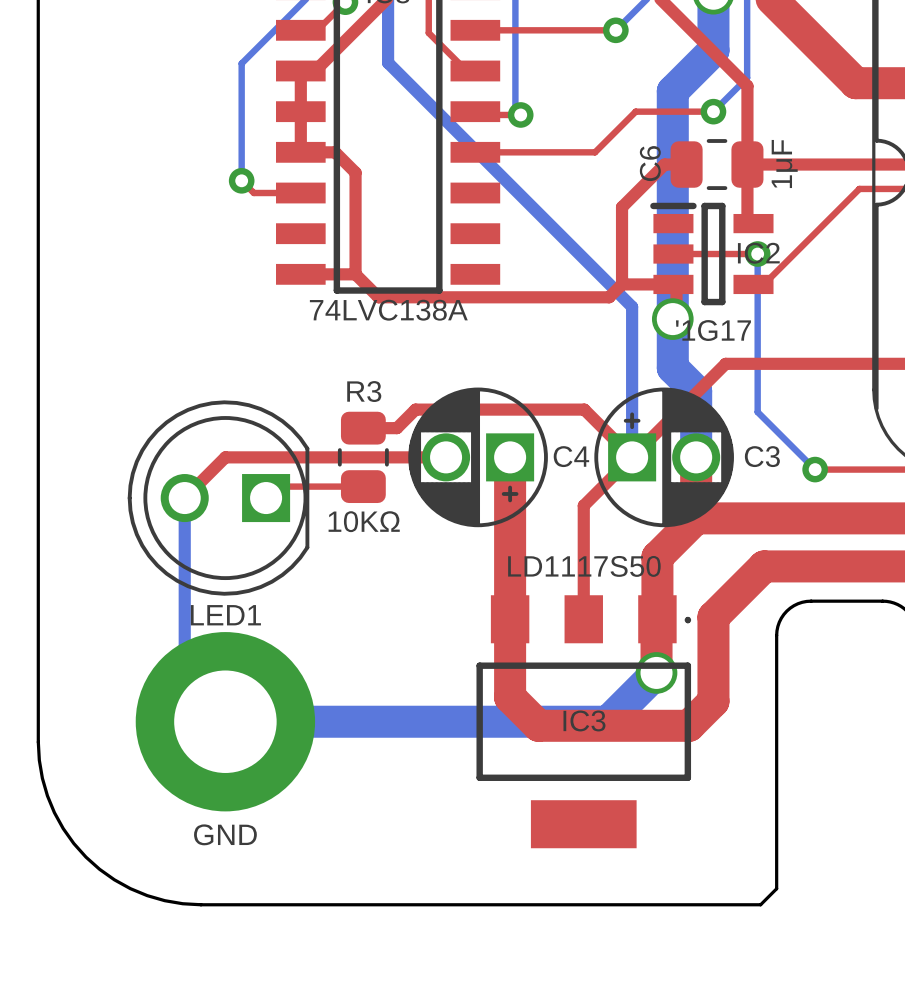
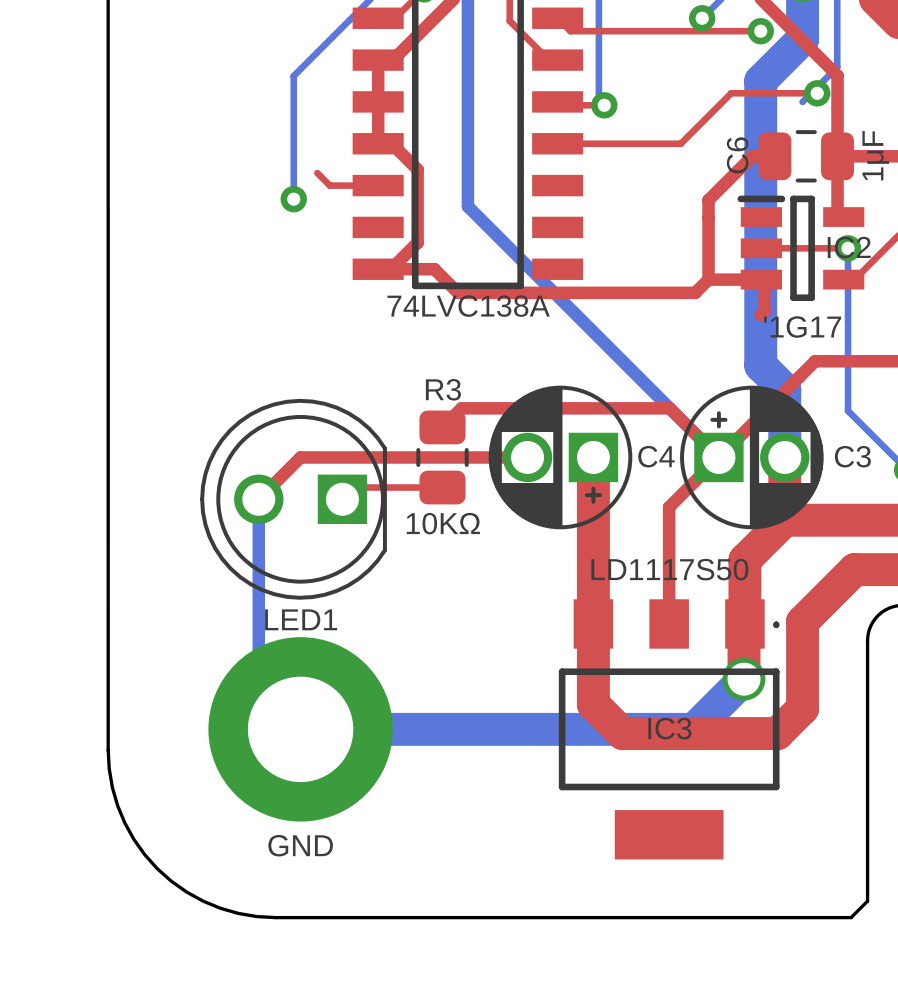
top track: (475, 30) (615, 30) -> (557, 18) (570, 31) (760, 31)
via: none -> (760, 31)
bottom track: (388, 62) (632, 306) (632, 457) -> (467, 51) (467, 206) (718, 457)
bottom track: (241, 63) (241, 180) -> (317, 52) (293, 76) (293, 199)
top track: (635, 111) (713, 111) -> (722, 101) (731, 93) (817, 93)
via position: (713, 111) -> (817, 93)
top track: (300, 152) (335, 152) (355, 172) (355, 274) -> none
top track: none -> (391, 143) (417, 169) (417, 242) (391, 269)
via position: (241, 180) -> (293, 199)
via: (672, 319) -> none
top track: (415, 409) (396, 428) (363, 428) -> (496, 408) (461, 408) (442, 427)

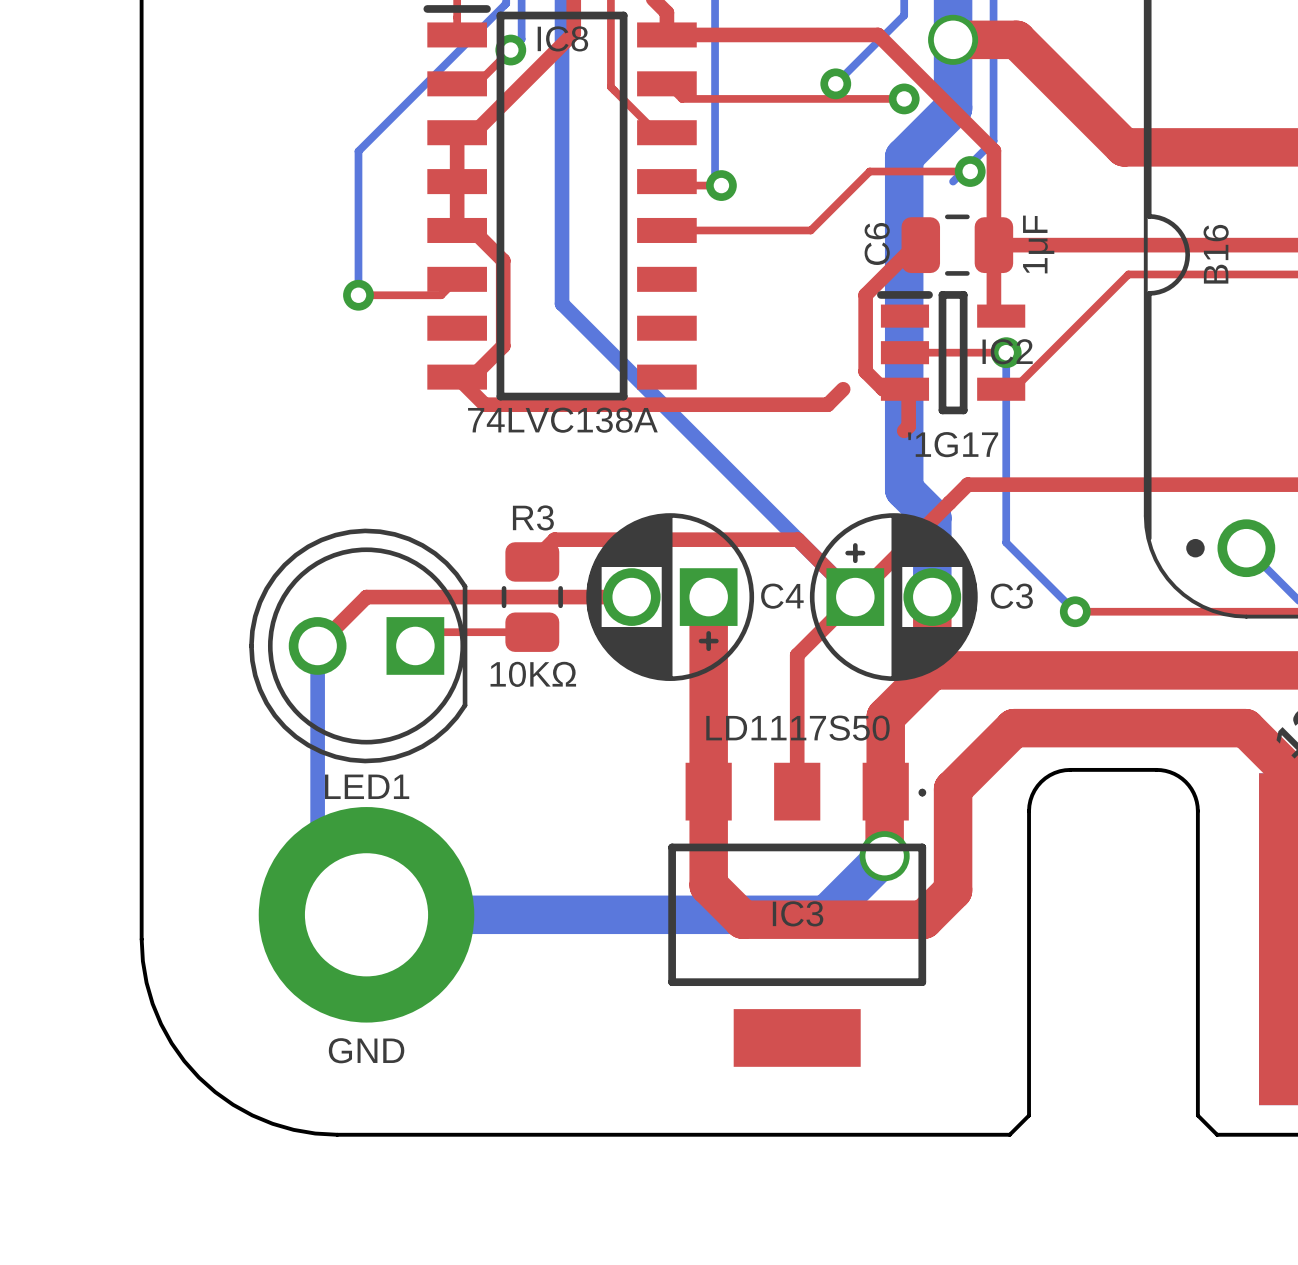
top track: (770, 156) (752, 156) (708, 200) (708, 279) (742, 279) -> (915, 245) (865, 295) (865, 371) (883, 389)
top track: (317, 173) (329, 185) (378, 185) -> (358, 295) (441, 295) (457, 279)
top track: (378, 269) (434, 269) (458, 292) -> (457, 377) (484, 404) (550, 404)

